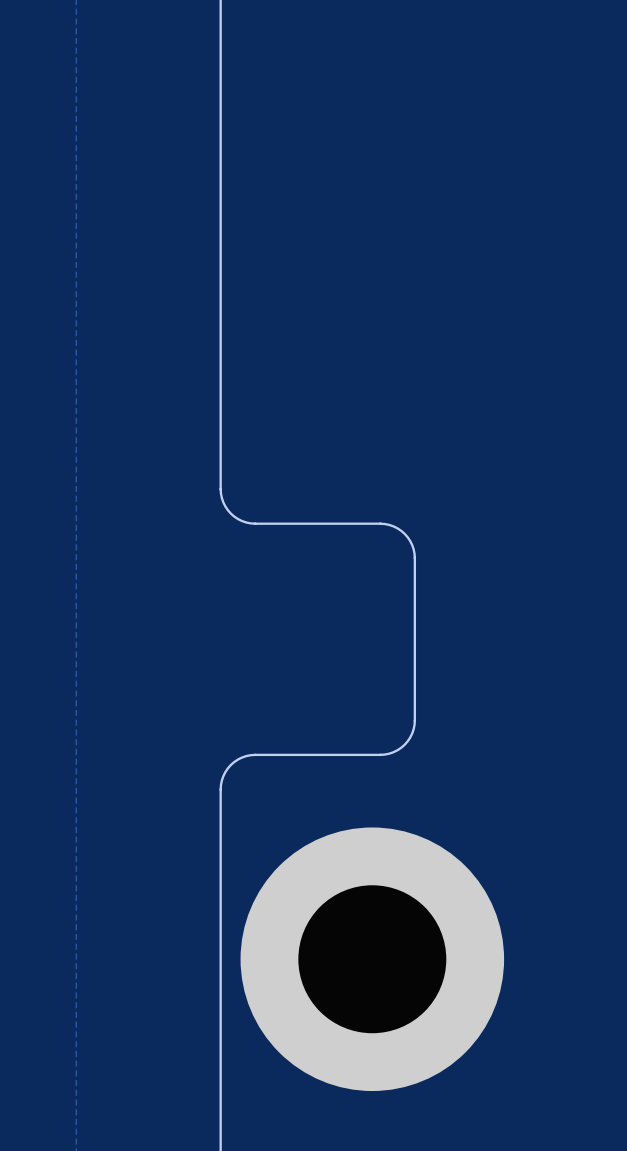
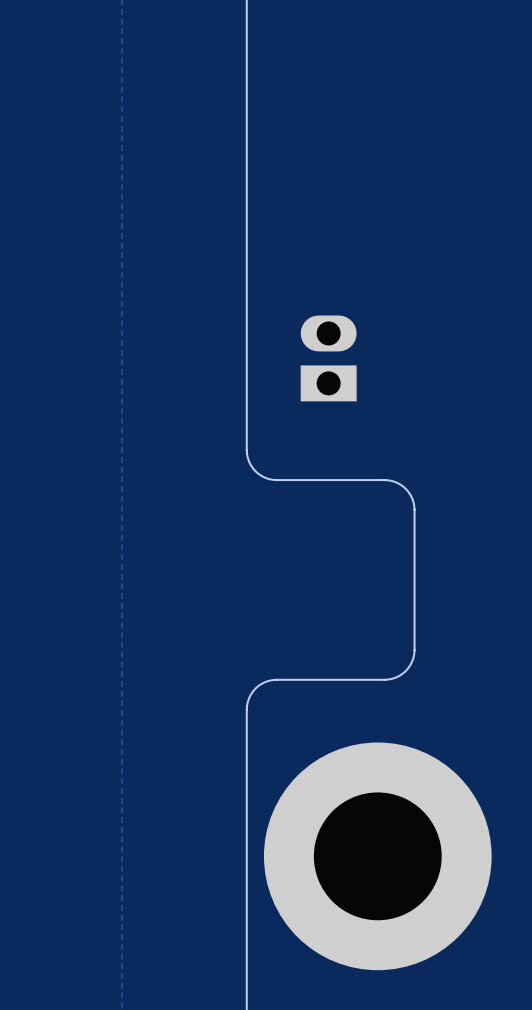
part: none -> (328, 358)

